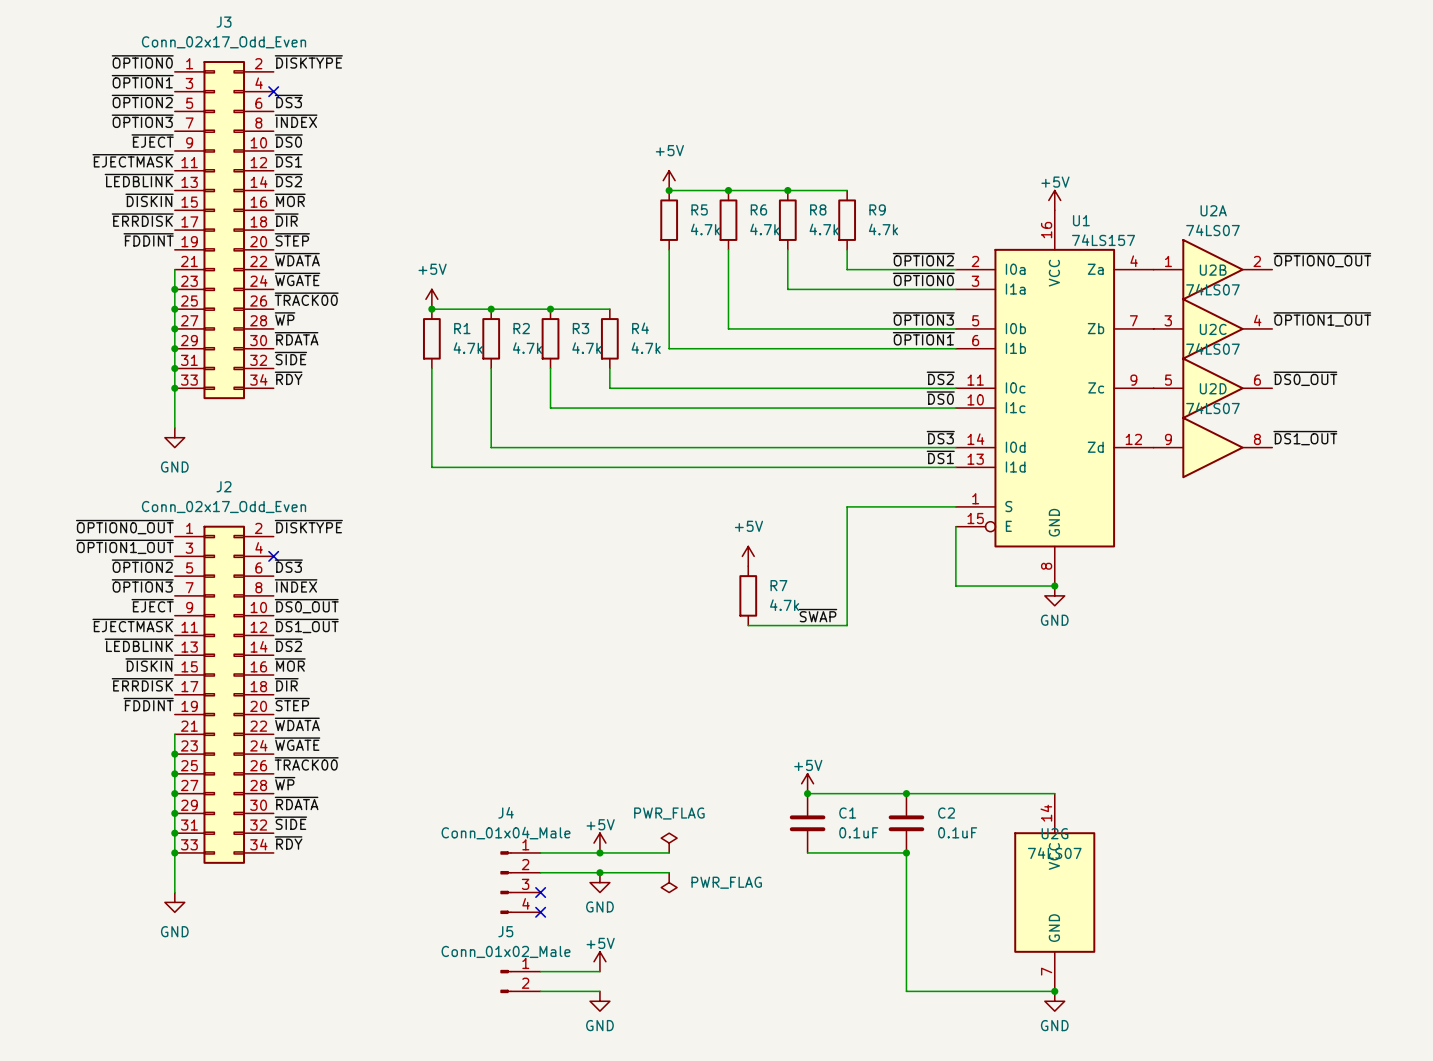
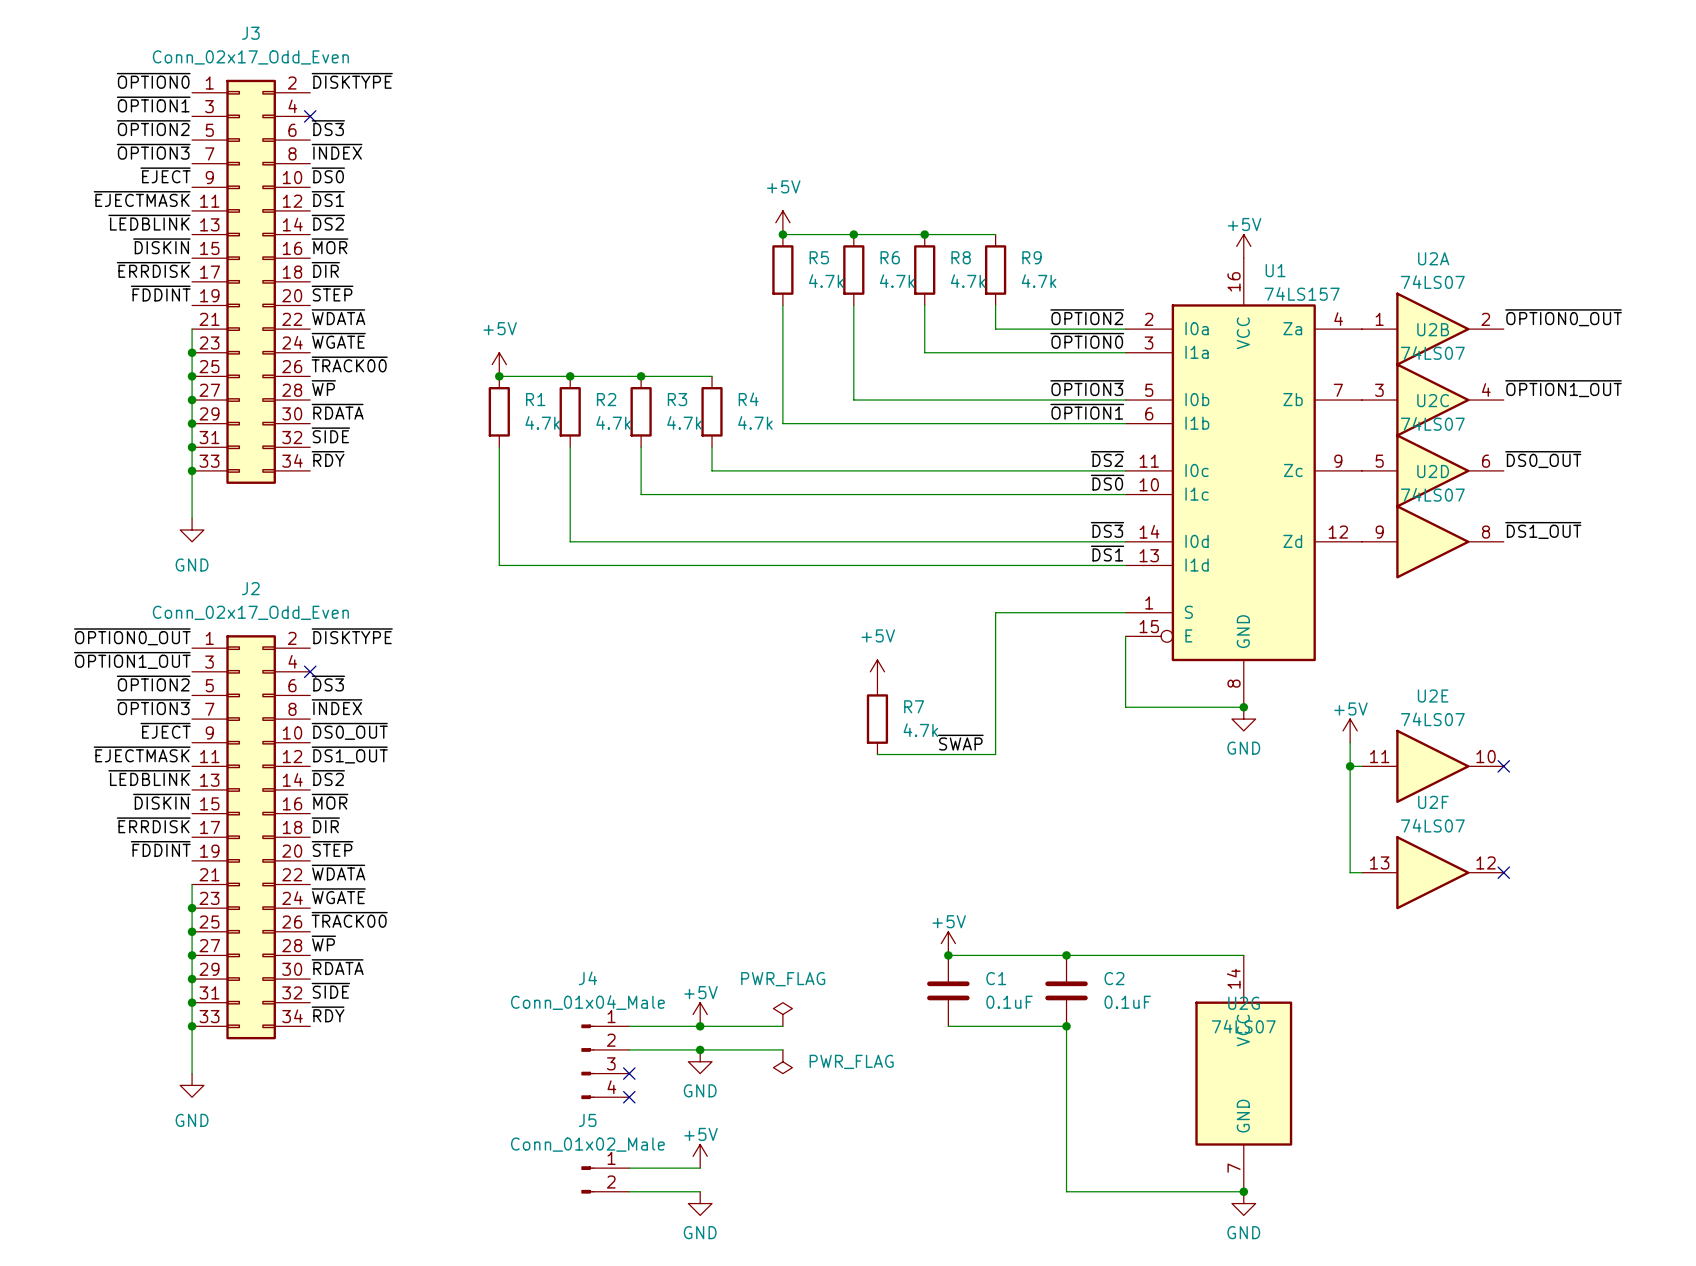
power symbol: none -> +5V (1350, 730)
wire: none -> (1350, 742) (1350, 872) (1361, 872)
wire: none -> (1350, 766) (1361, 766)
junction: none -> (1350, 766)
U2E: none -> 74LS07 (1432, 766)
no-connect mark: none -> (1503, 766)
U2F: none -> 74LS07 (1432, 872)
no-connect mark: none -> (1503, 872)

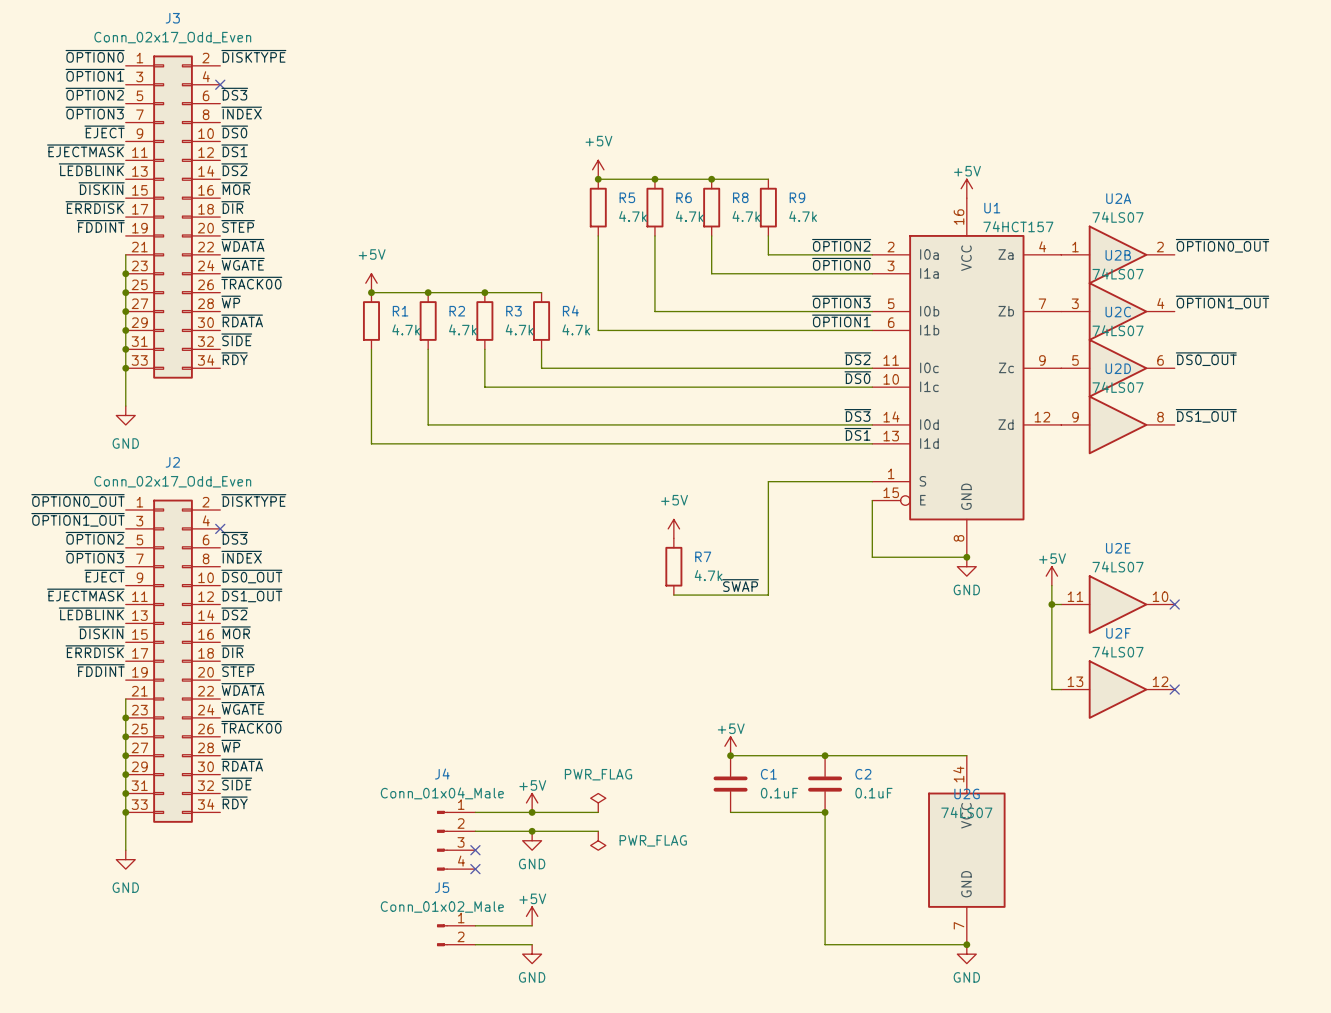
U1 value: 74LS157 (1302, 293) -> 74HCT157 (1018, 226)

